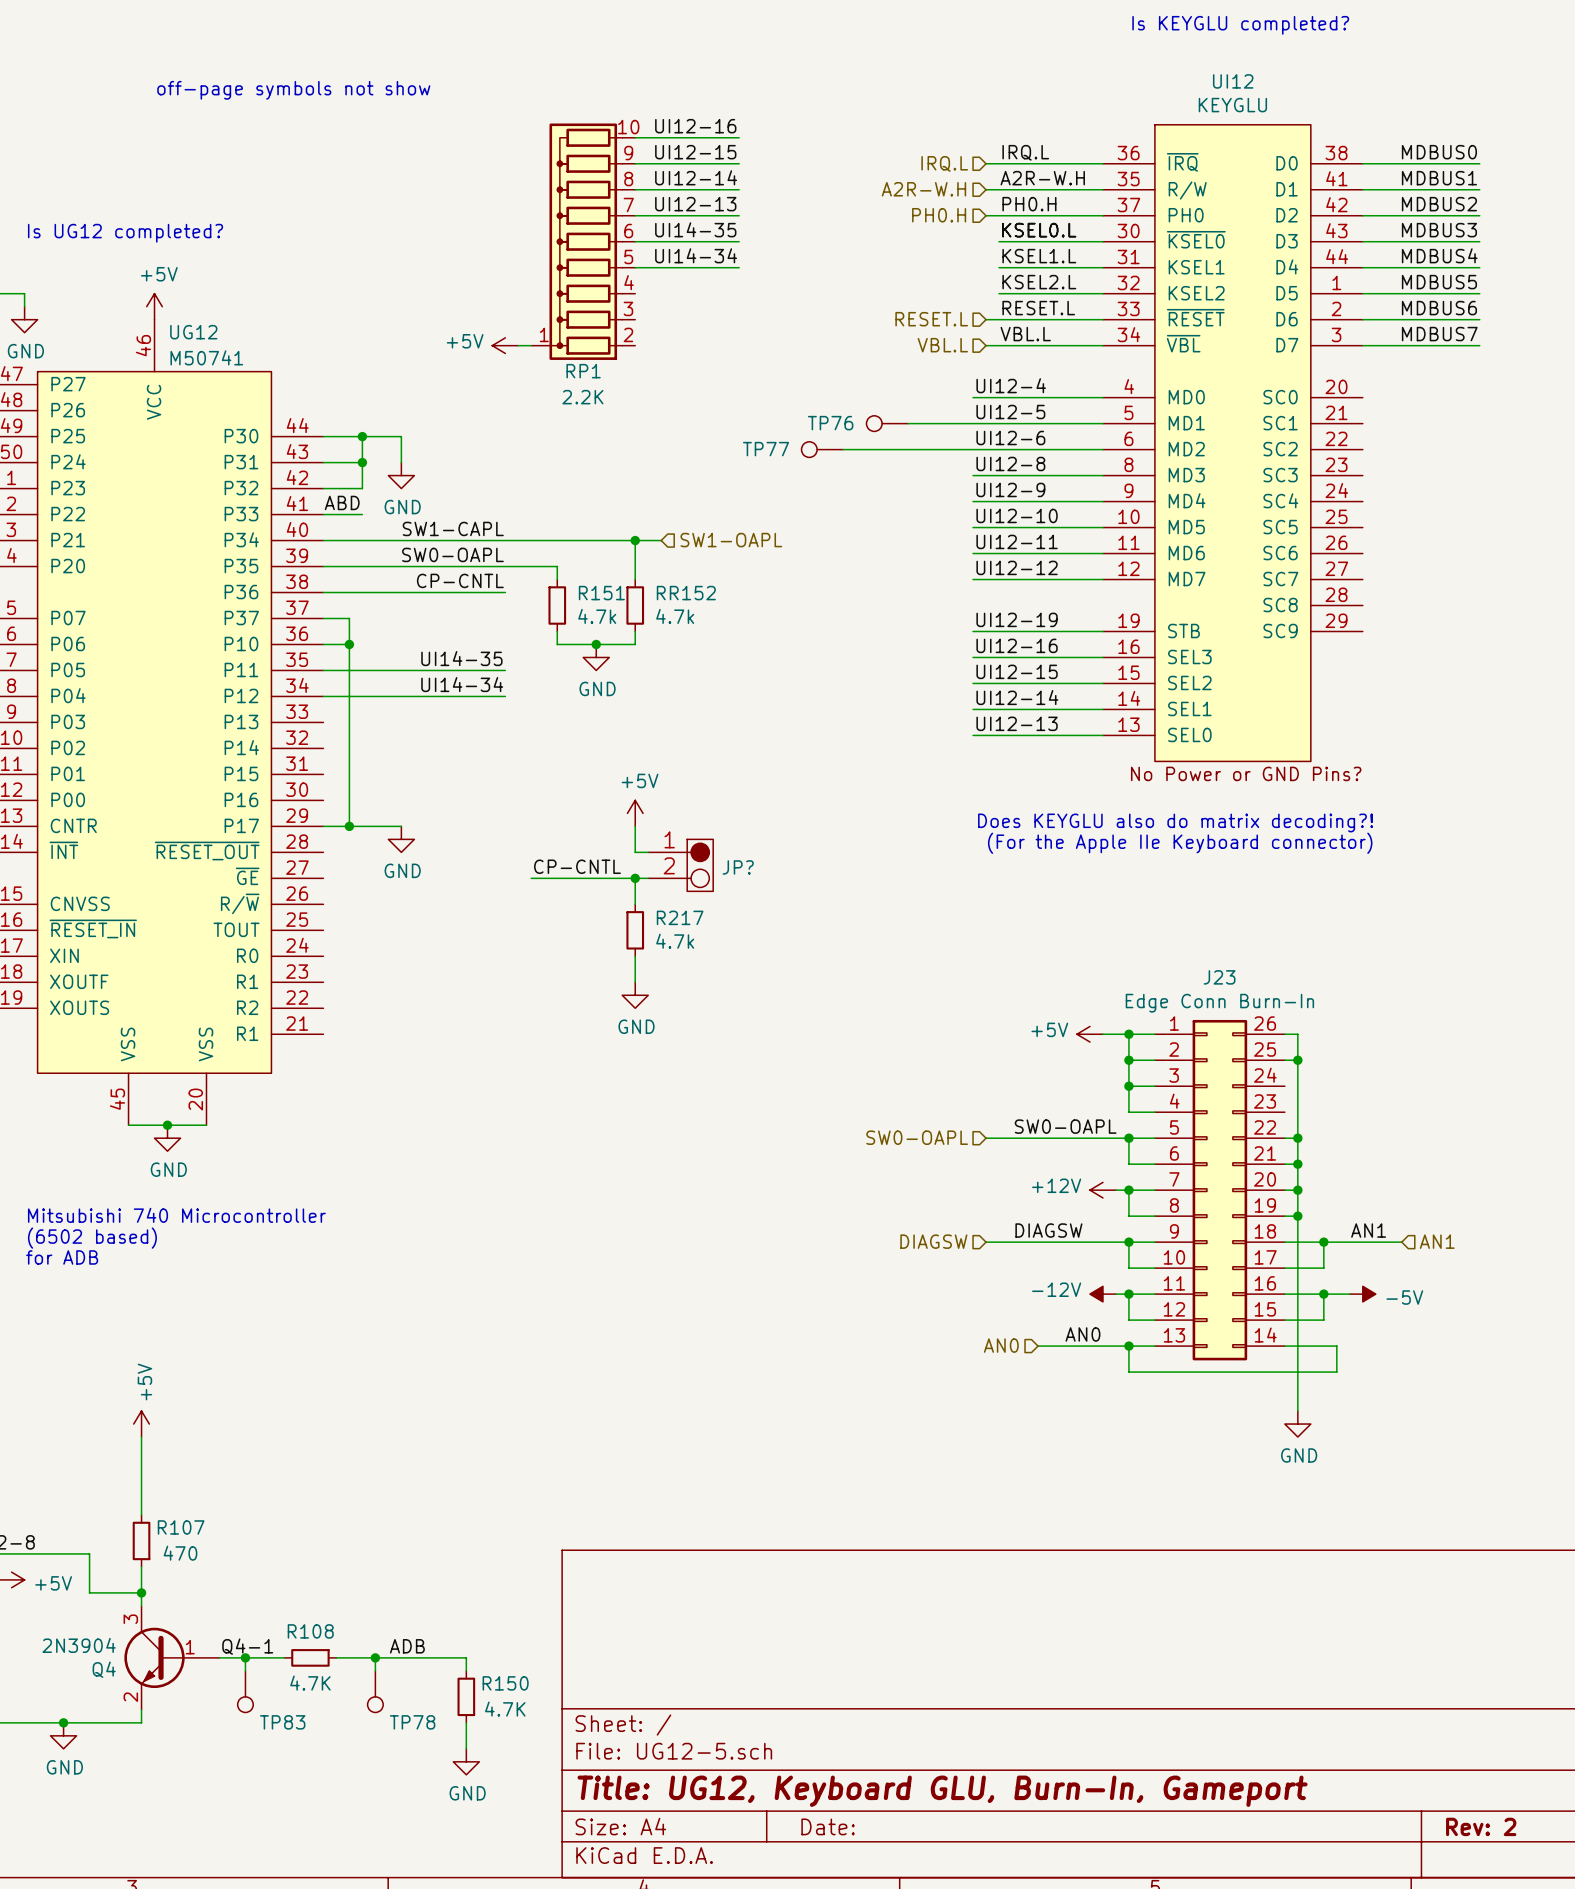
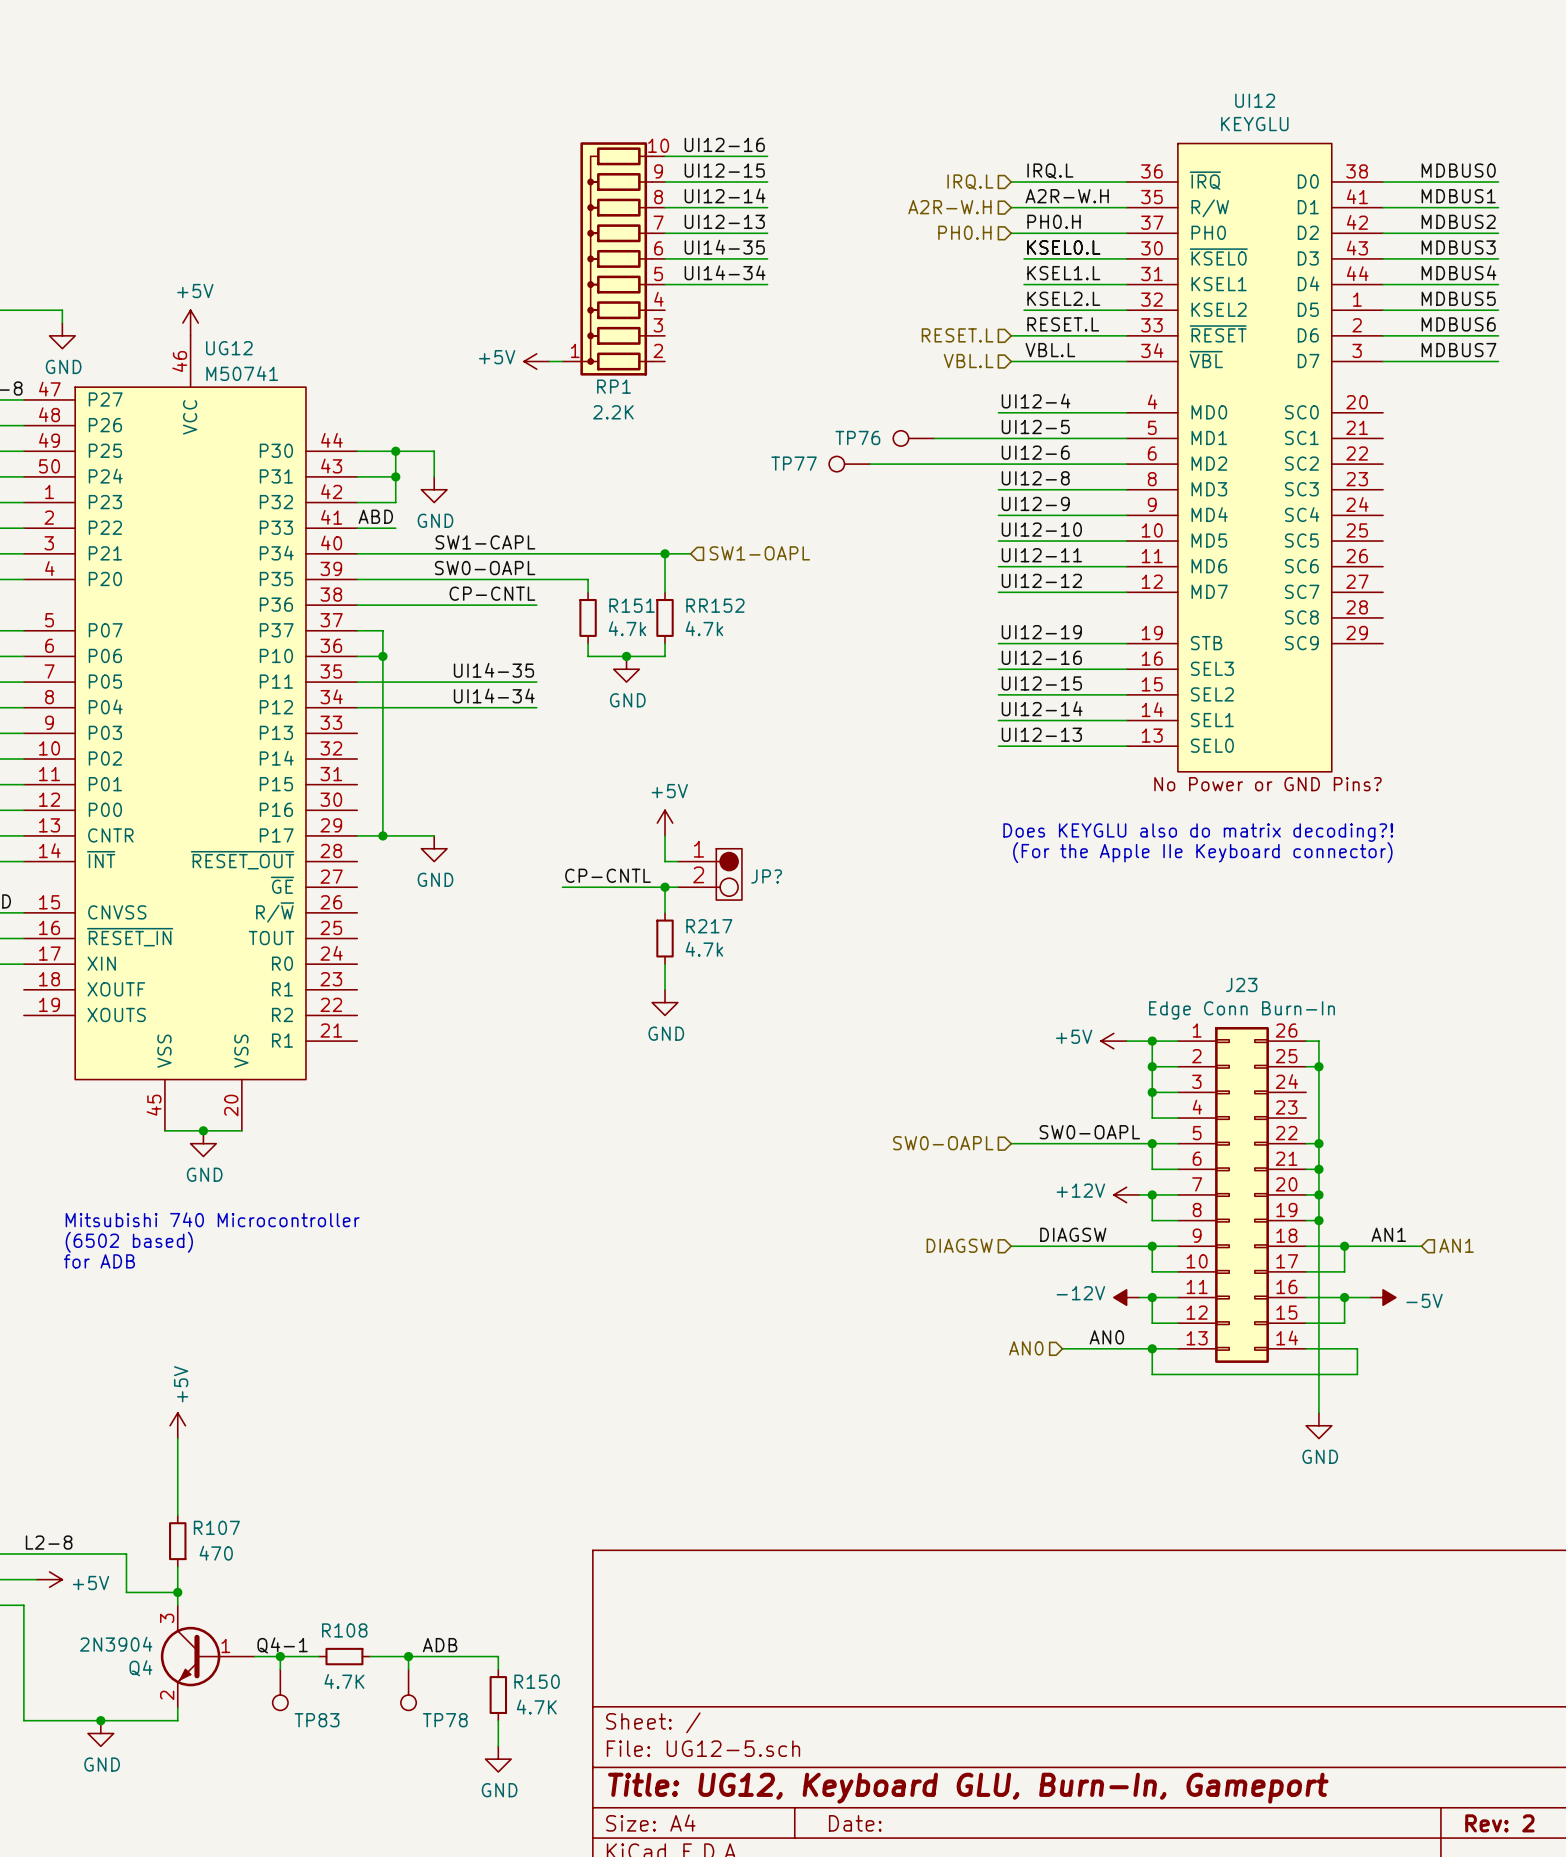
text: Is KEYGLU completed? (1240, 25) -> none
text: off-page symbols not show (293, 90) -> none
text: Is UG12 completed? (125, 233) -> none

